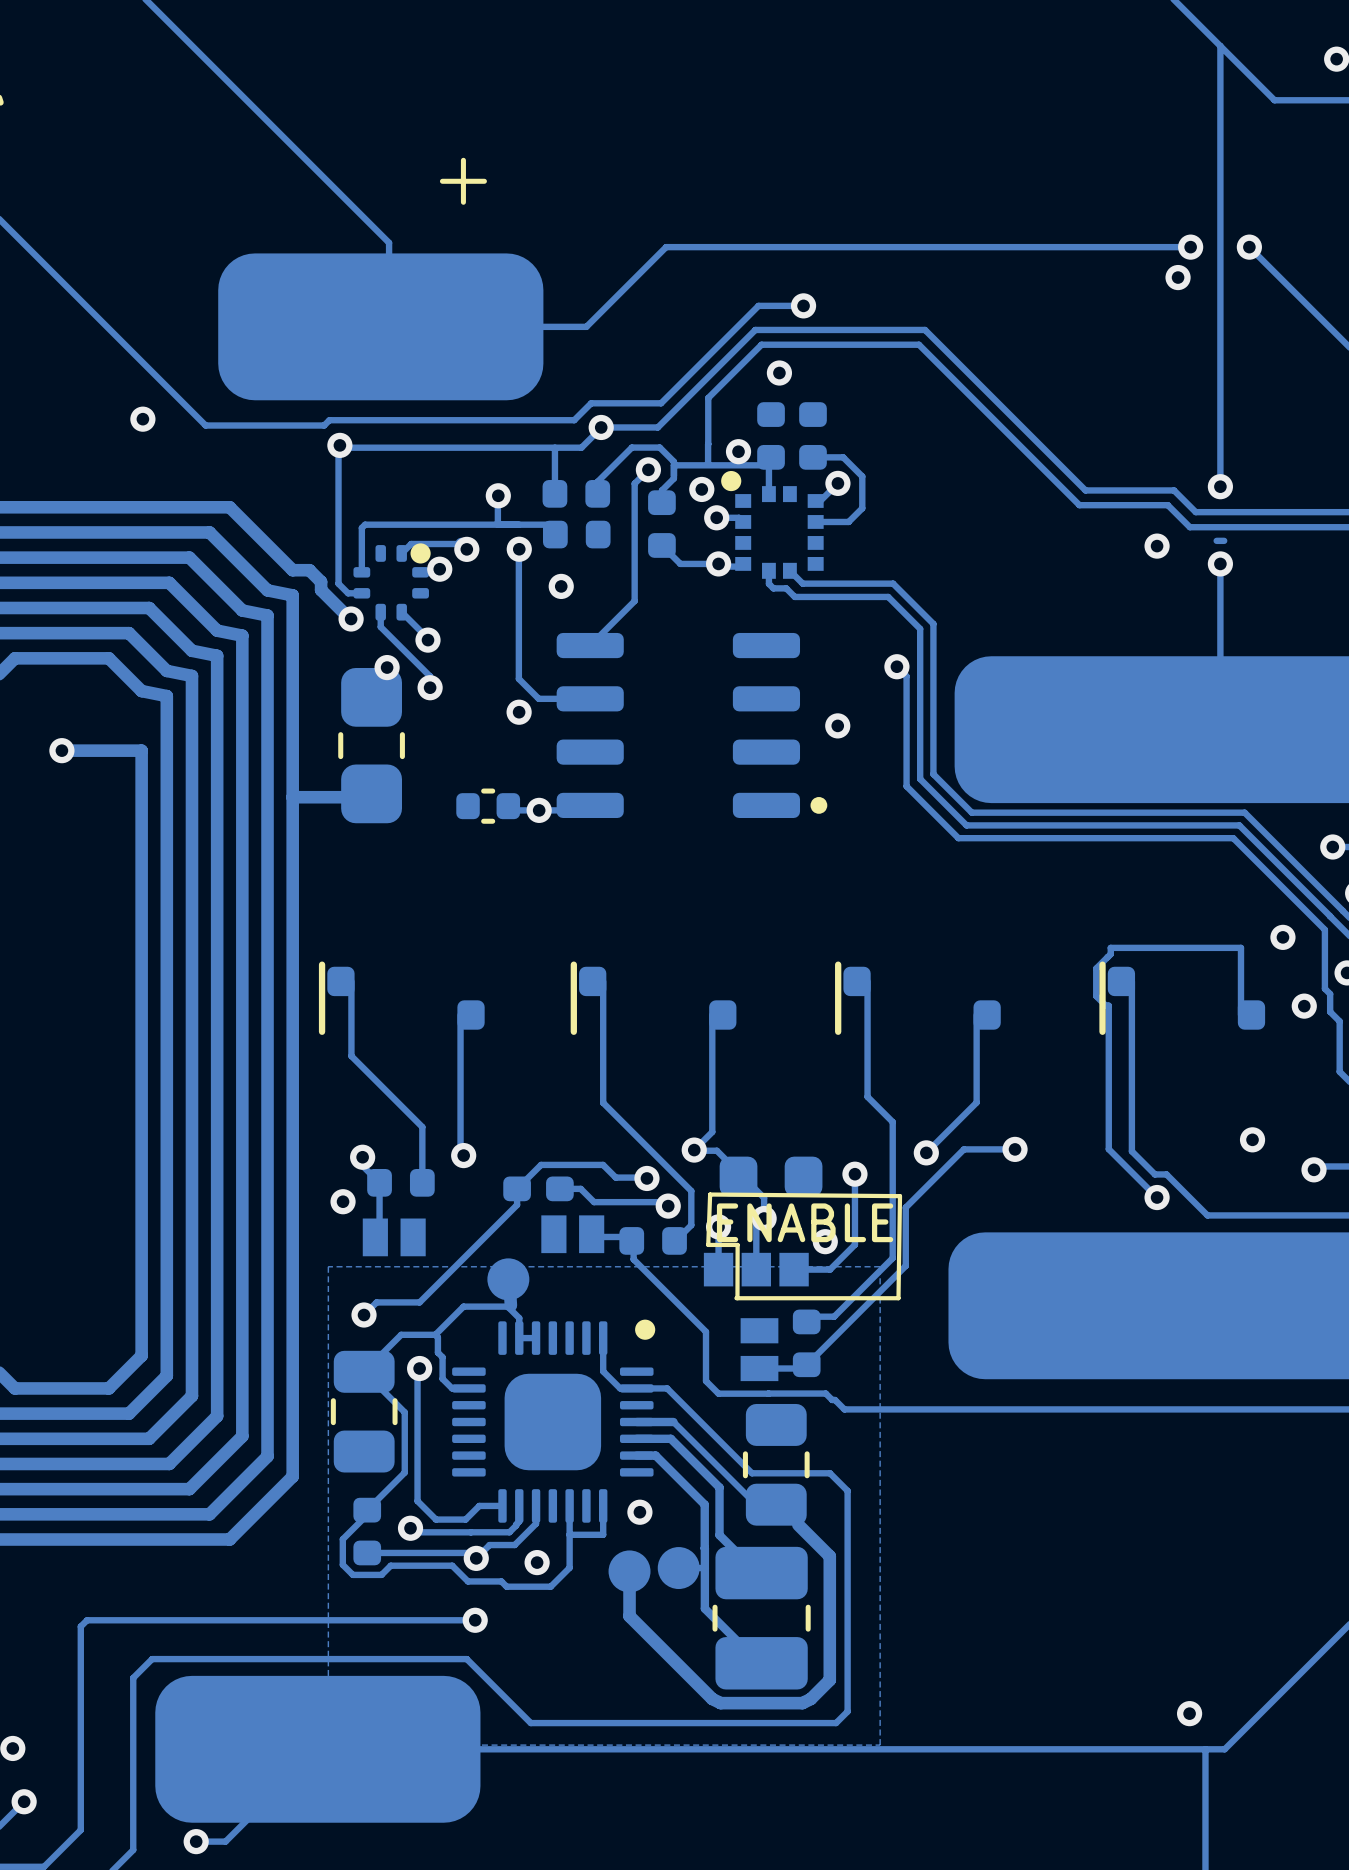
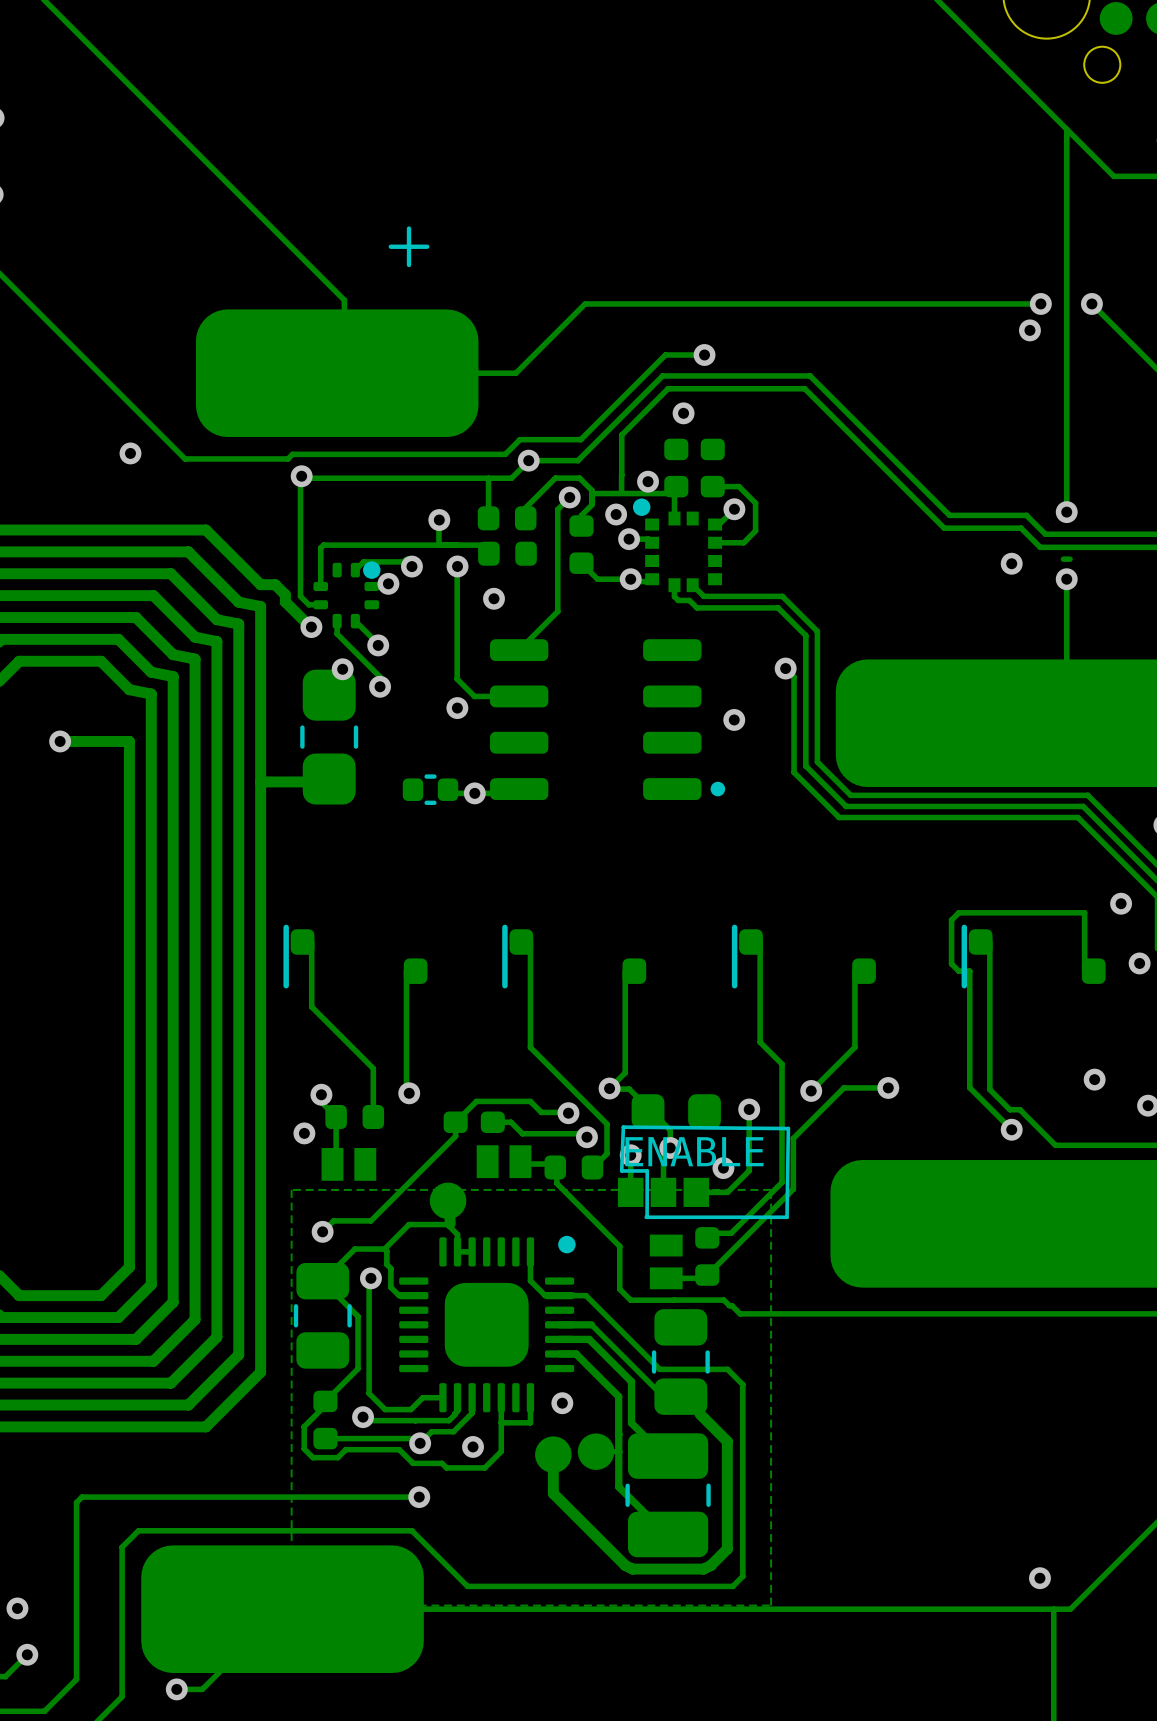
track: (1110, 947) (1110, 954) (1096, 968) (1096, 996) (1105, 1005) (1108, 1005) (1108, 1015) -> (971, 912) (958, 912) (951, 920) (951, 963) (958, 971) (969, 971)

